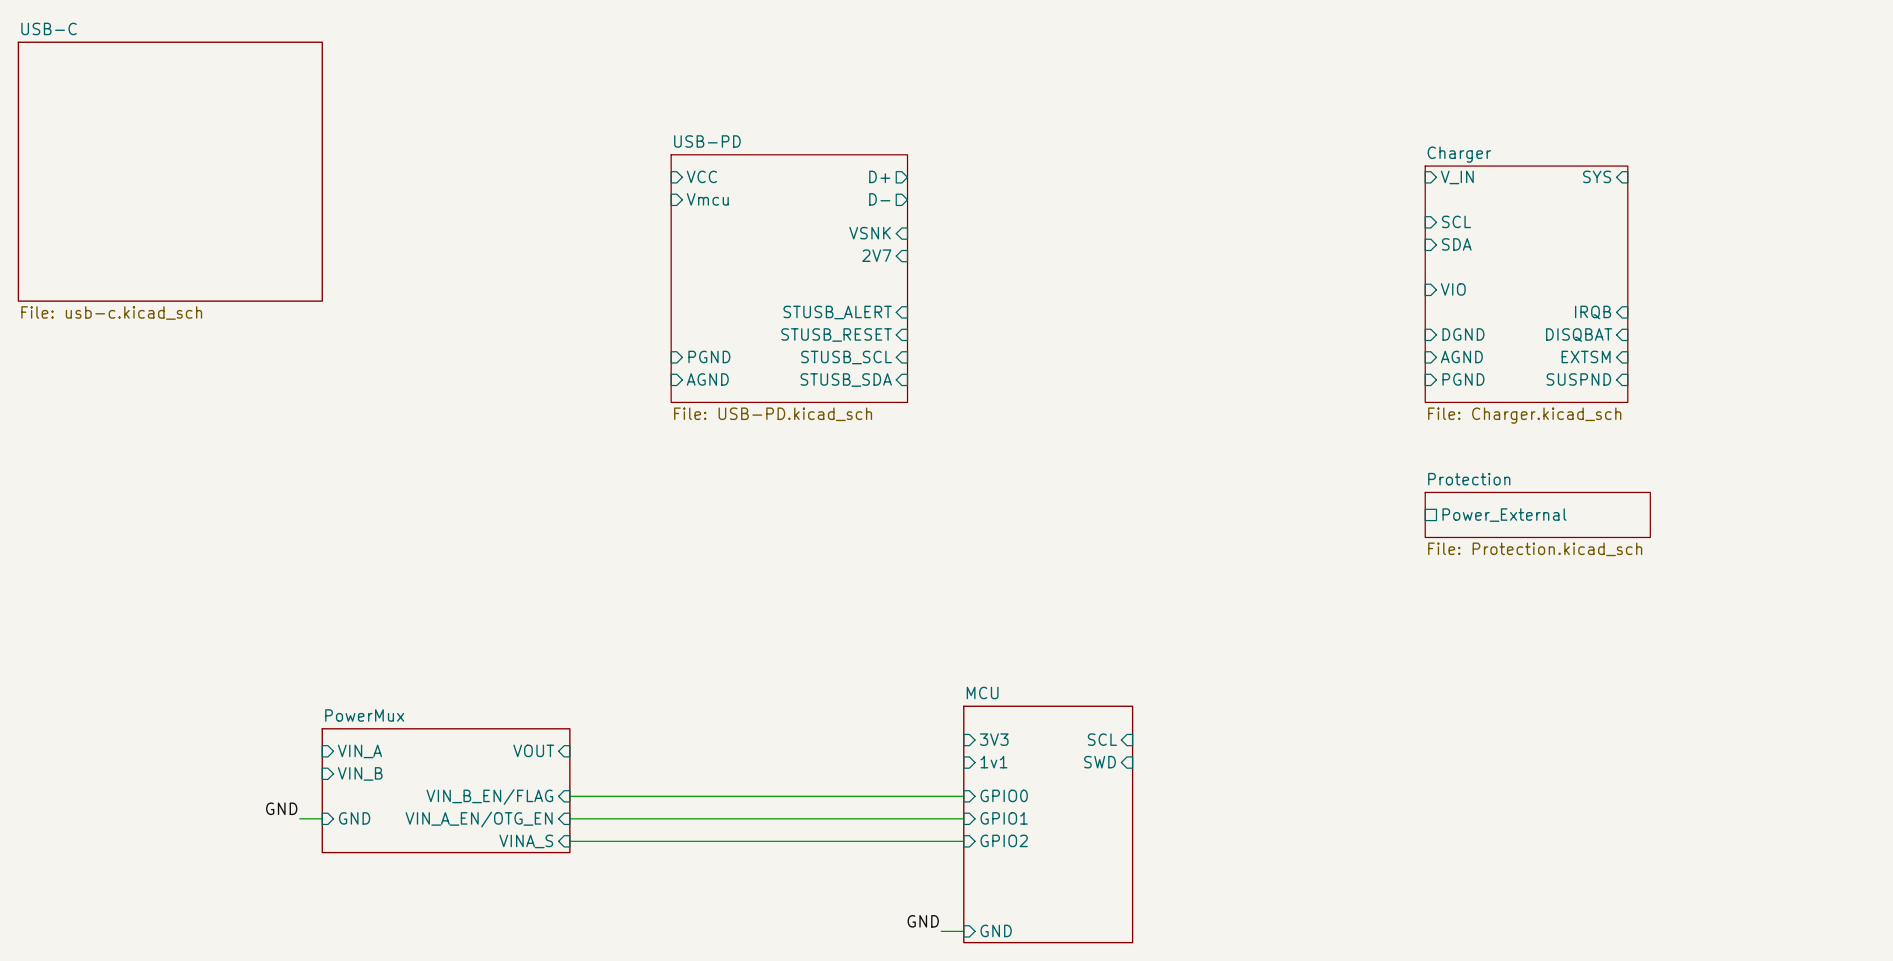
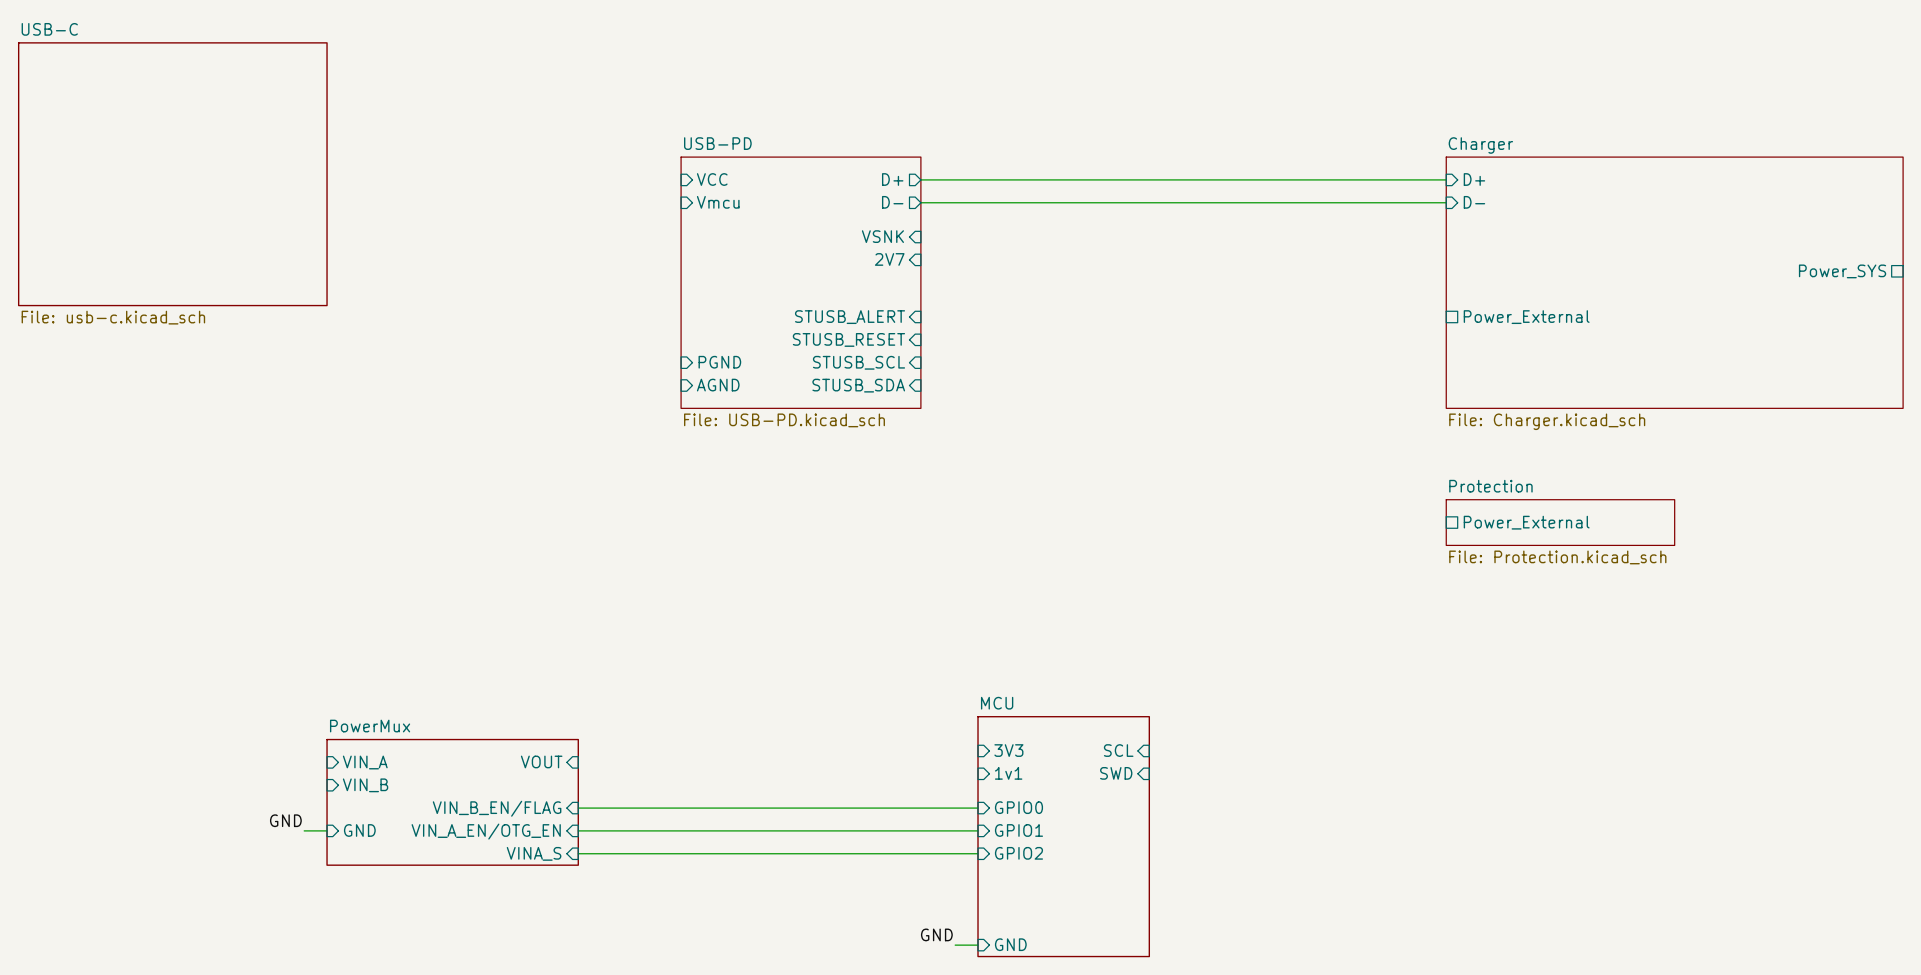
sheet pin: SYS (1597, 176) -> none
wire: none -> (920, 179) (1446, 179)
sheet pin: V_IN (1457, 177) -> D+ (1474, 179)
wire: none -> (920, 202) (1446, 202)
sheet pin: none -> D- (1474, 202)
sheet pin: SCL (1456, 221) -> none
sheet pin: SDA (1456, 244) -> none
sheet pin: none -> Power_SYS (1842, 271)
sheet Charger: none -> File: Charger.kicad_sch (1674, 282)
sheet Charger: File: Charger.kicad_sch (1526, 284) -> none
sheet pin: VIO (1453, 289) -> none
sheet pin: none -> Power_External (1526, 317)
sheet pin: IRQB (1593, 312) -> none
sheet pin: DGND (1463, 334) -> none
sheet pin: DISQBAT (1579, 334) -> none
sheet pin: AGND (1461, 356) -> none
sheet pin: EXTSM (1586, 356) -> none
sheet pin: PGND (1463, 379) -> none
sheet pin: SUSPND (1578, 379) -> none

